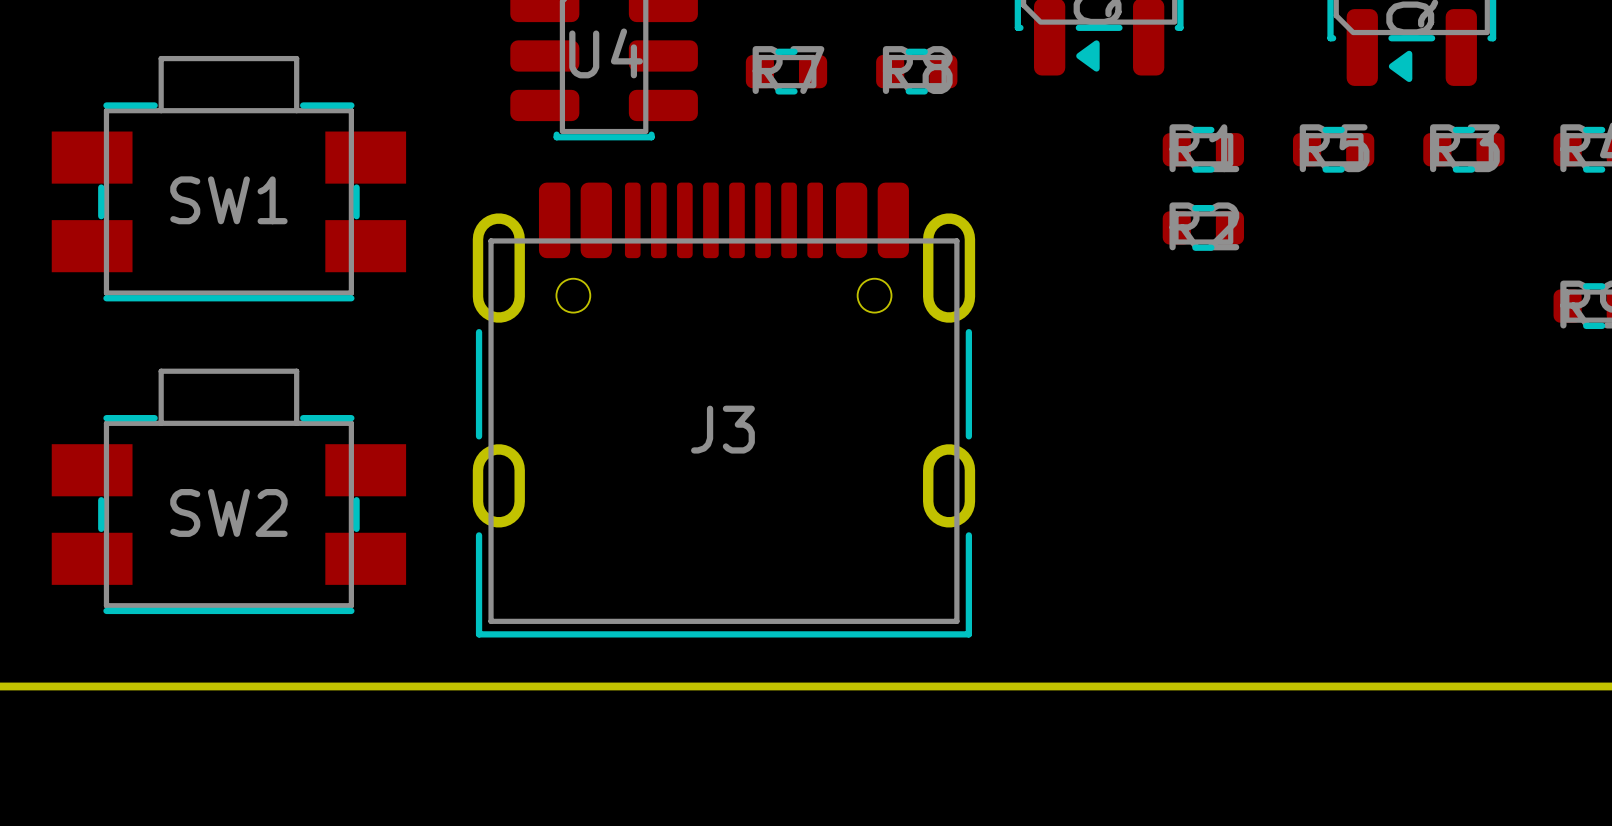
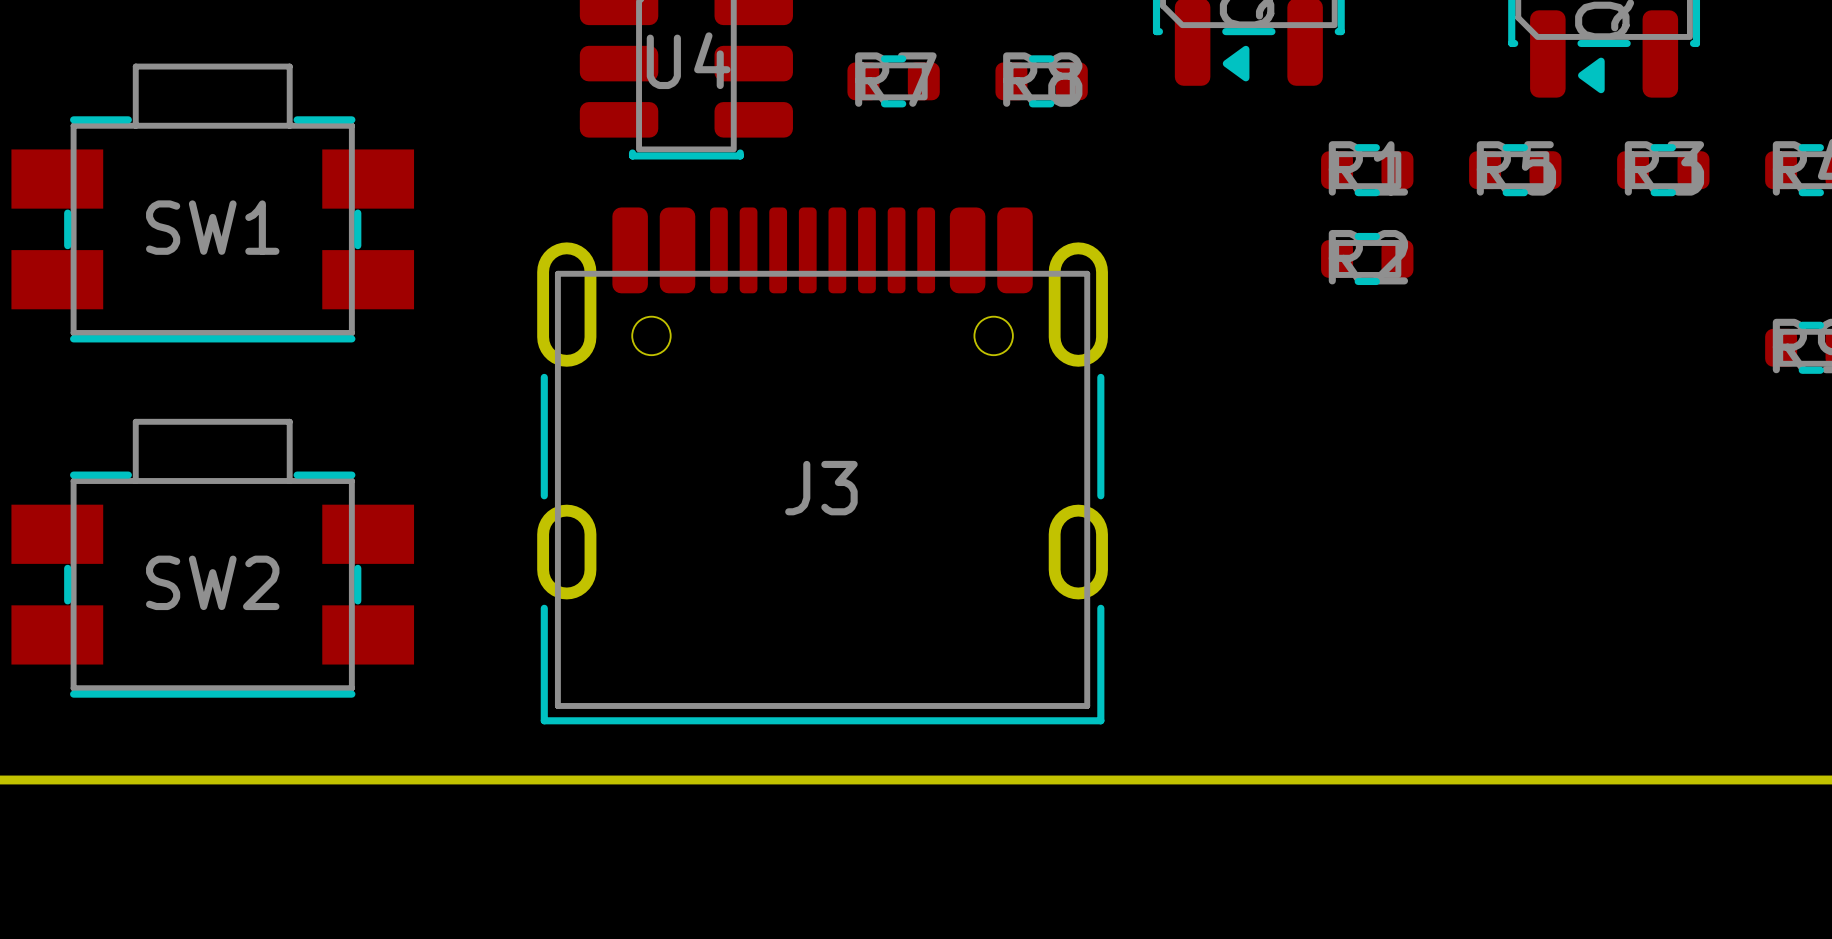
SW1 position: (228, 178) -> (212, 203)
SW2 position: (228, 491) -> (212, 558)

